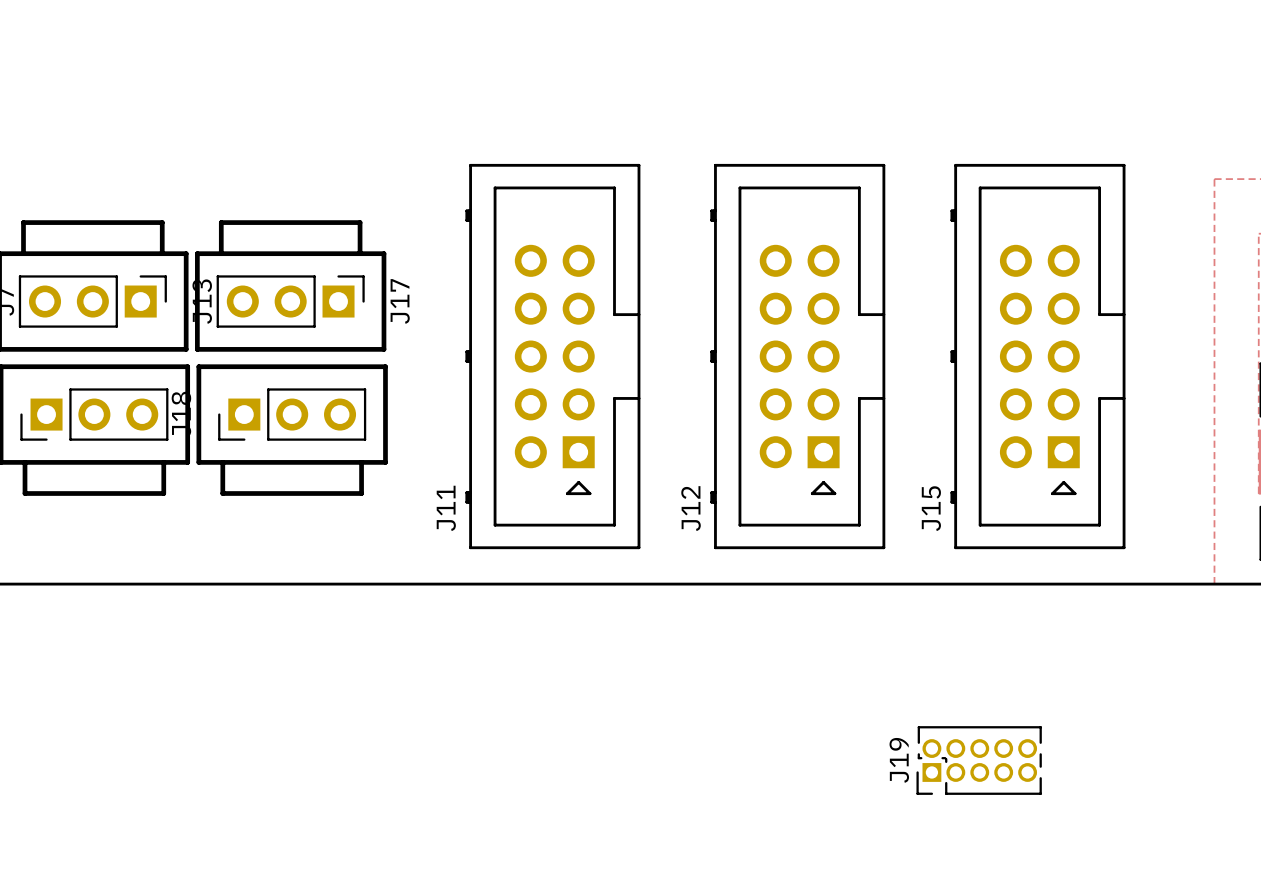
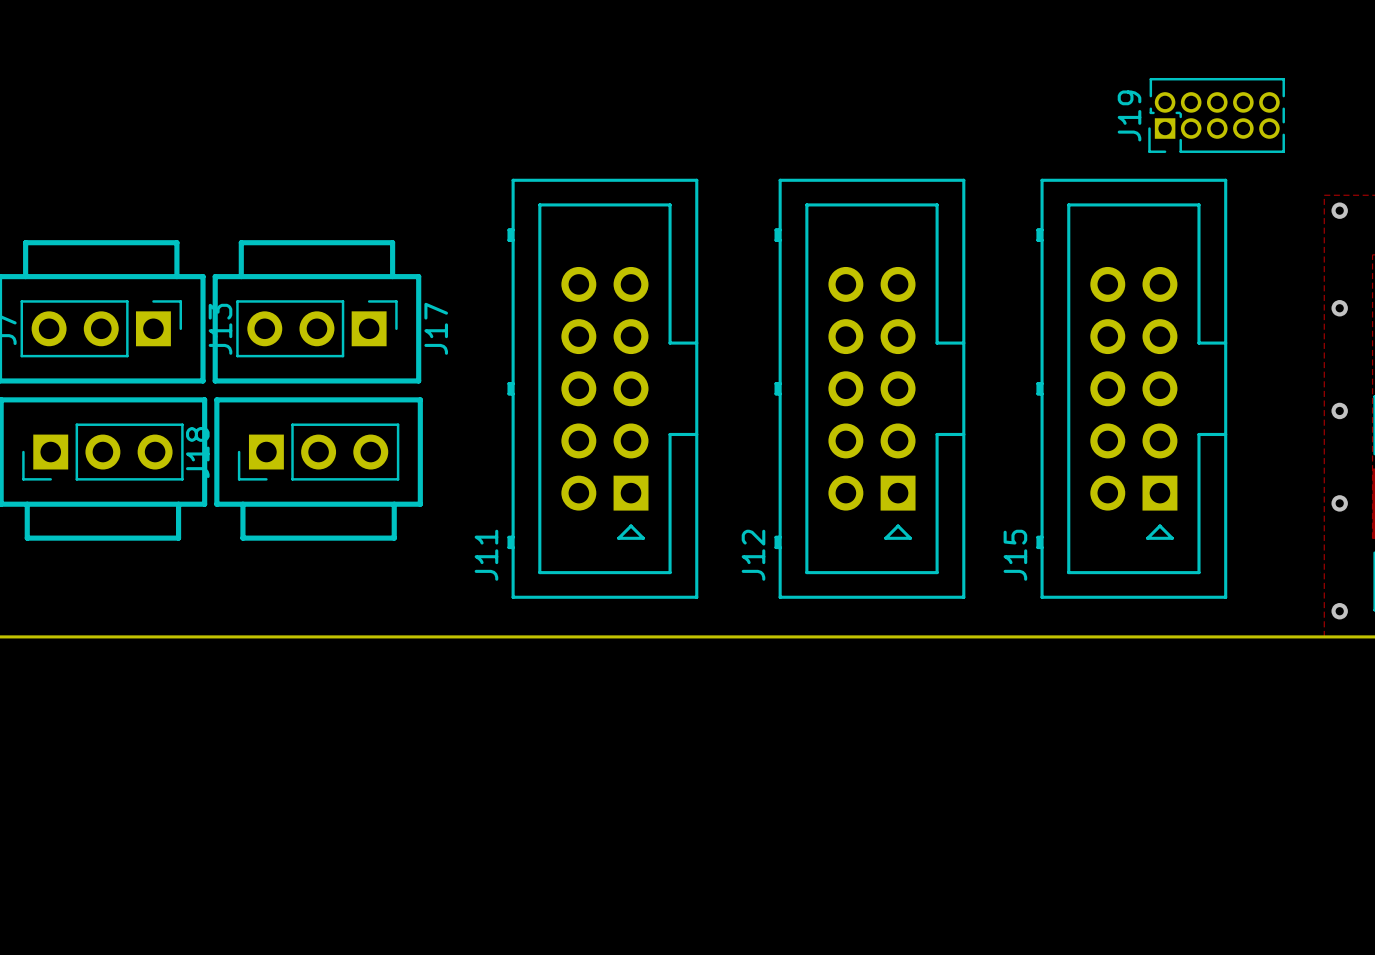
via: none -> (1339, 210)
via: none -> (1339, 308)
via: none -> (1339, 410)
via: none -> (1339, 503)
via: none -> (1339, 611)
J19 position: (979, 760) -> (1216, 115)

